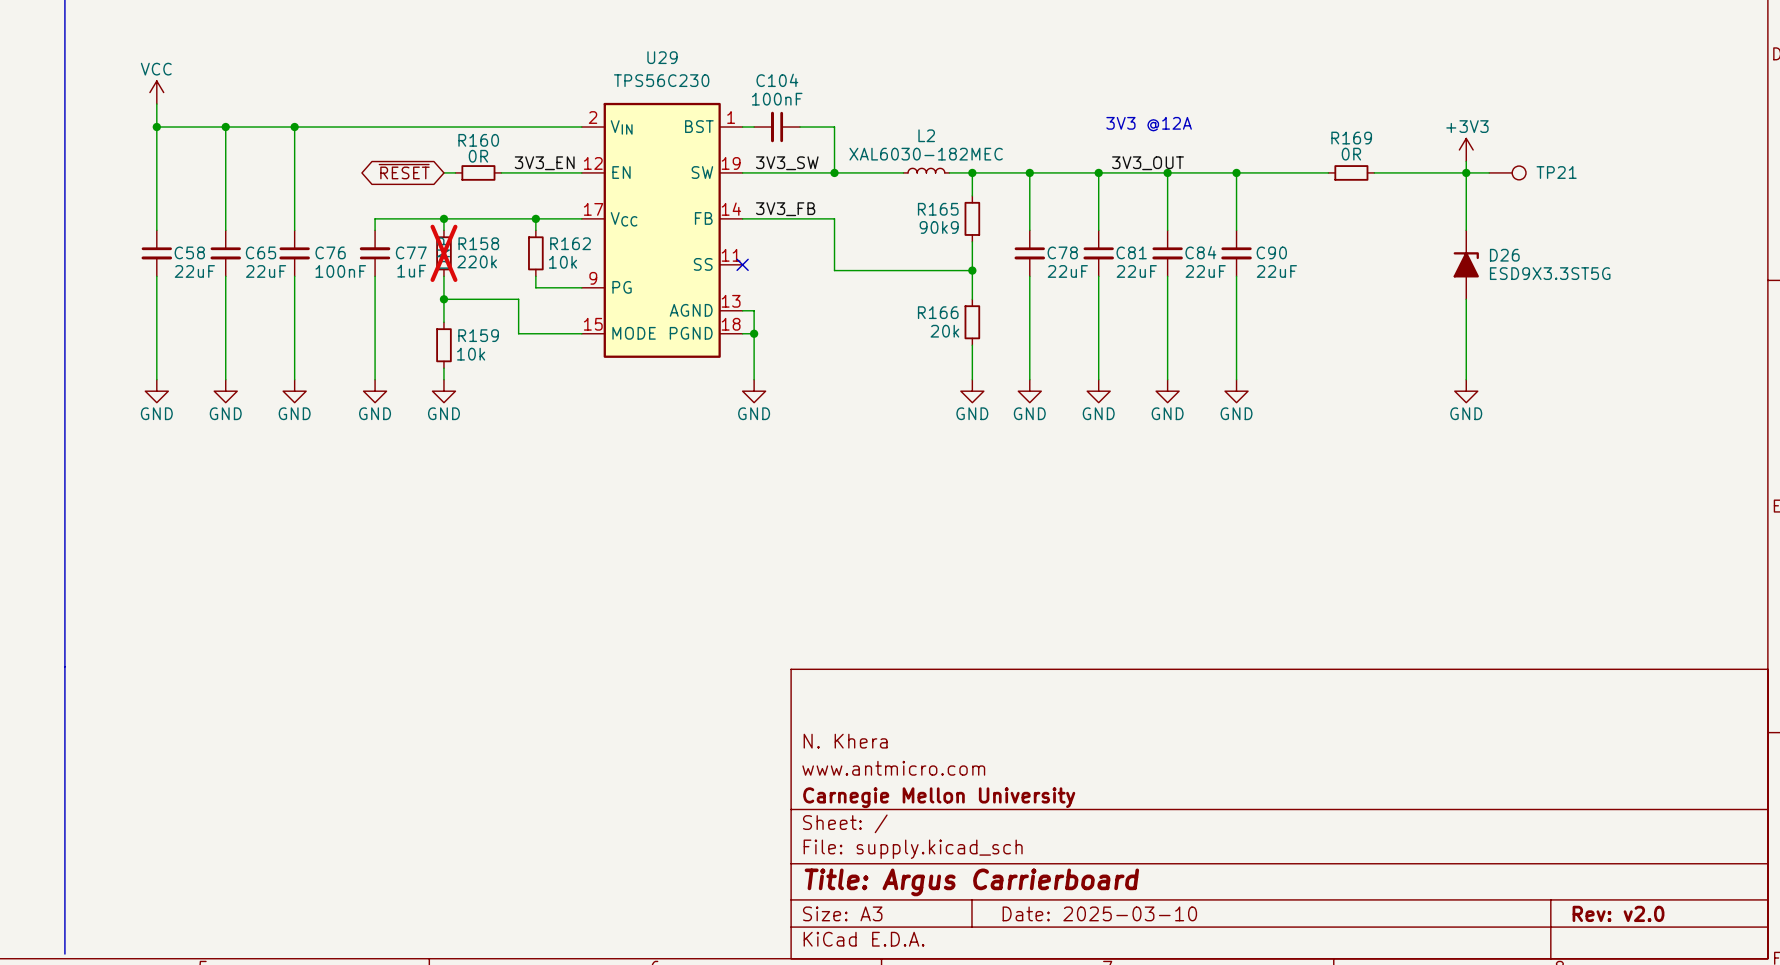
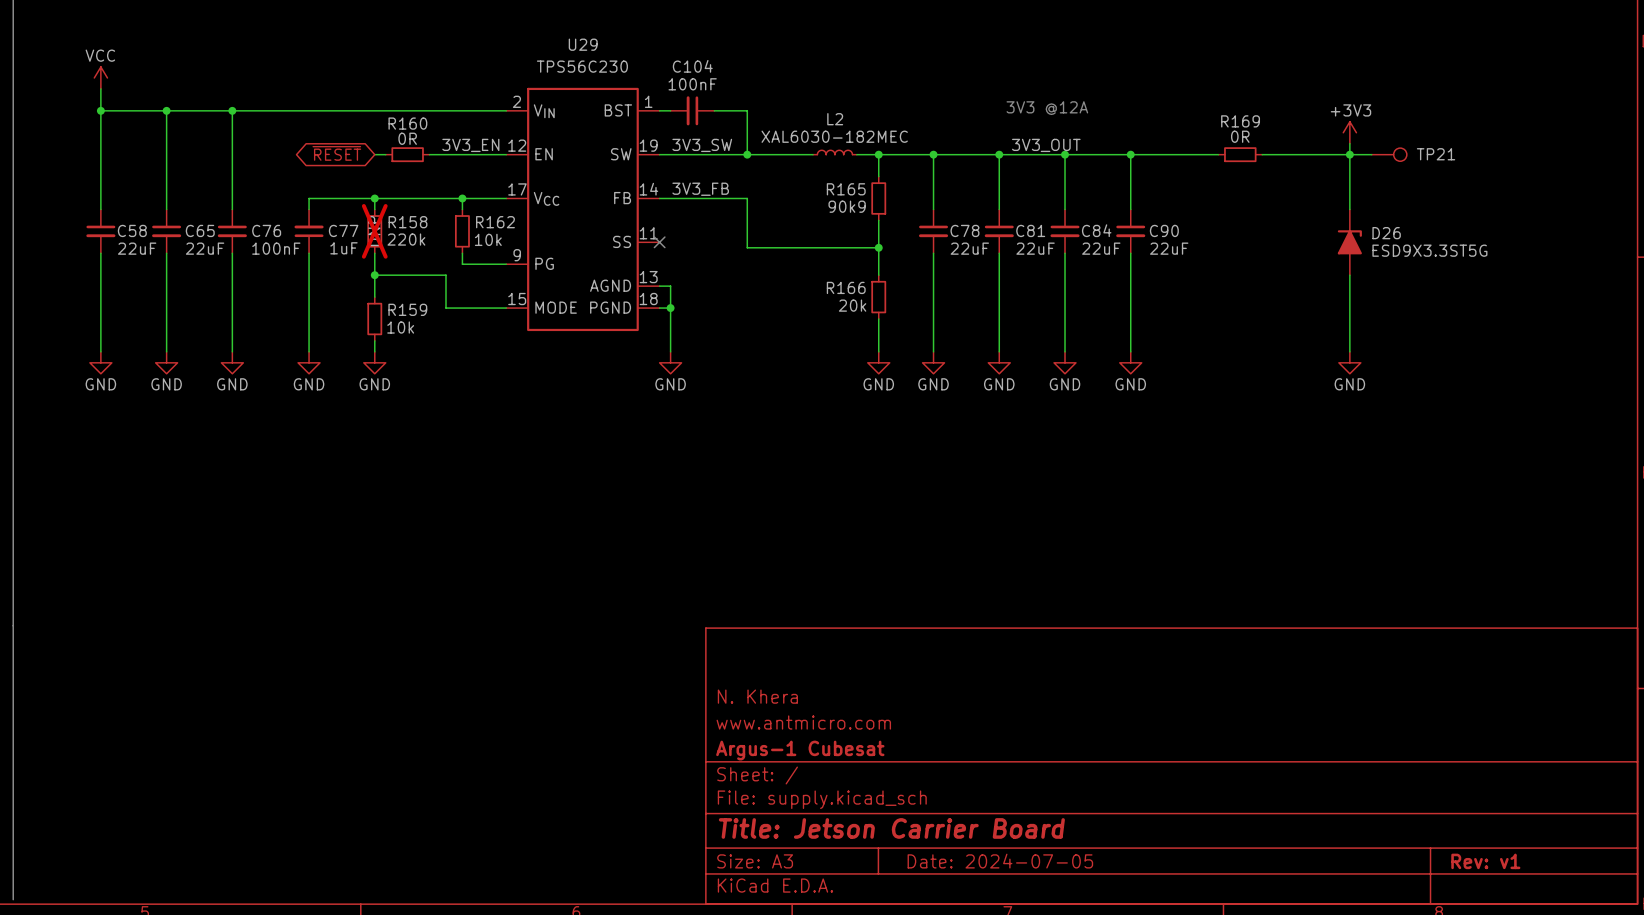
title block: Carnegie Mellon University (939, 797) -> Argus-1 Cubesat (800, 750)
title block: Title: Argus Carrierboard (971, 882) -> Title: Jetson Carrier Board (891, 828)
title block: Date: 2025-03-10 (1099, 913) -> Date: 2024-07-05 (1000, 861)
title block: Rev: v2.0 (1618, 913) -> Rev: v1 (1485, 861)

